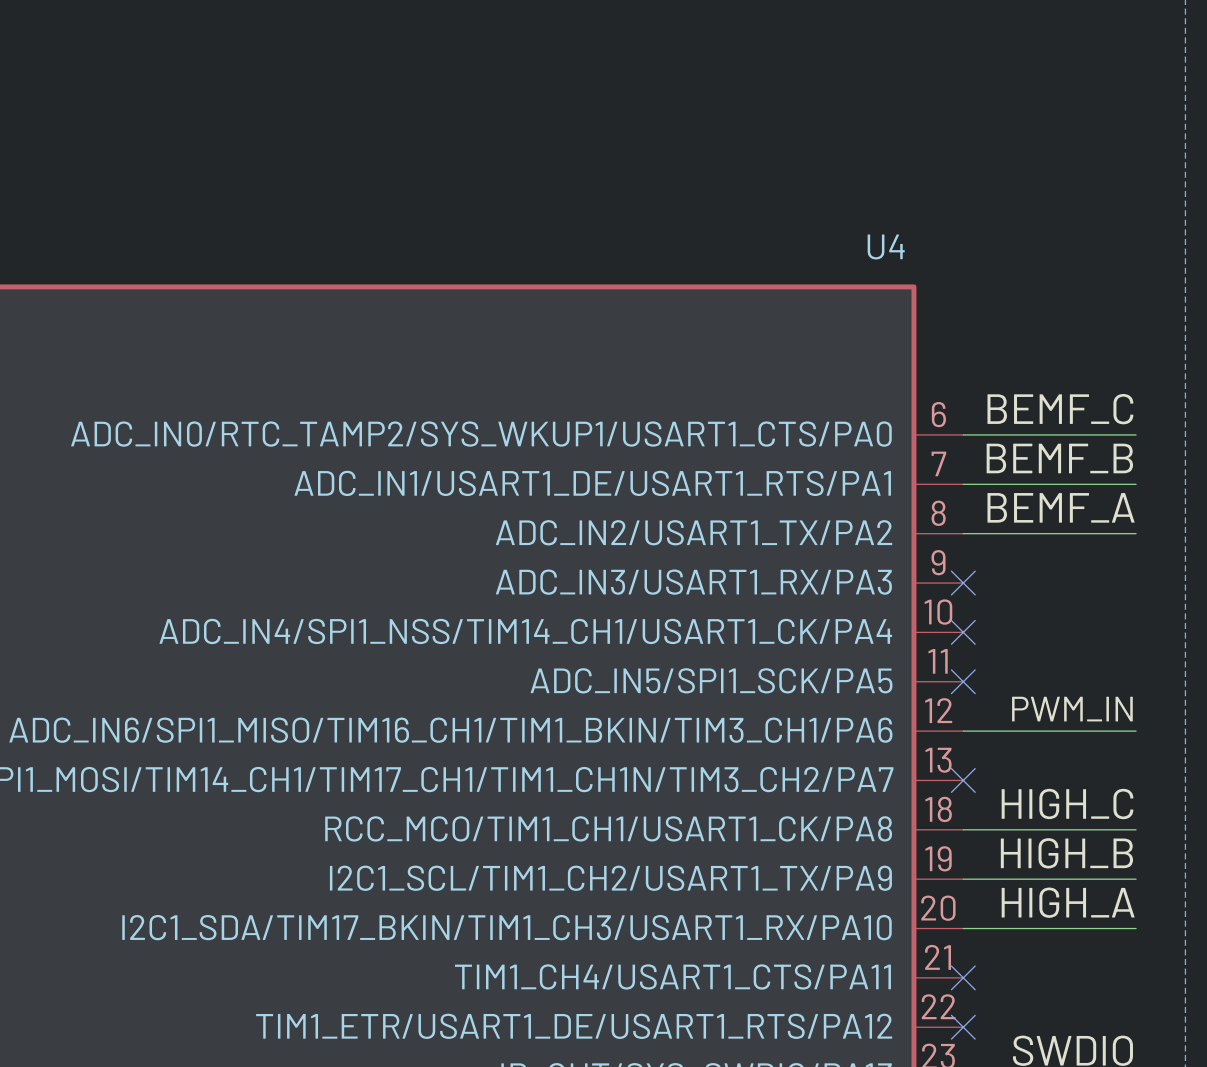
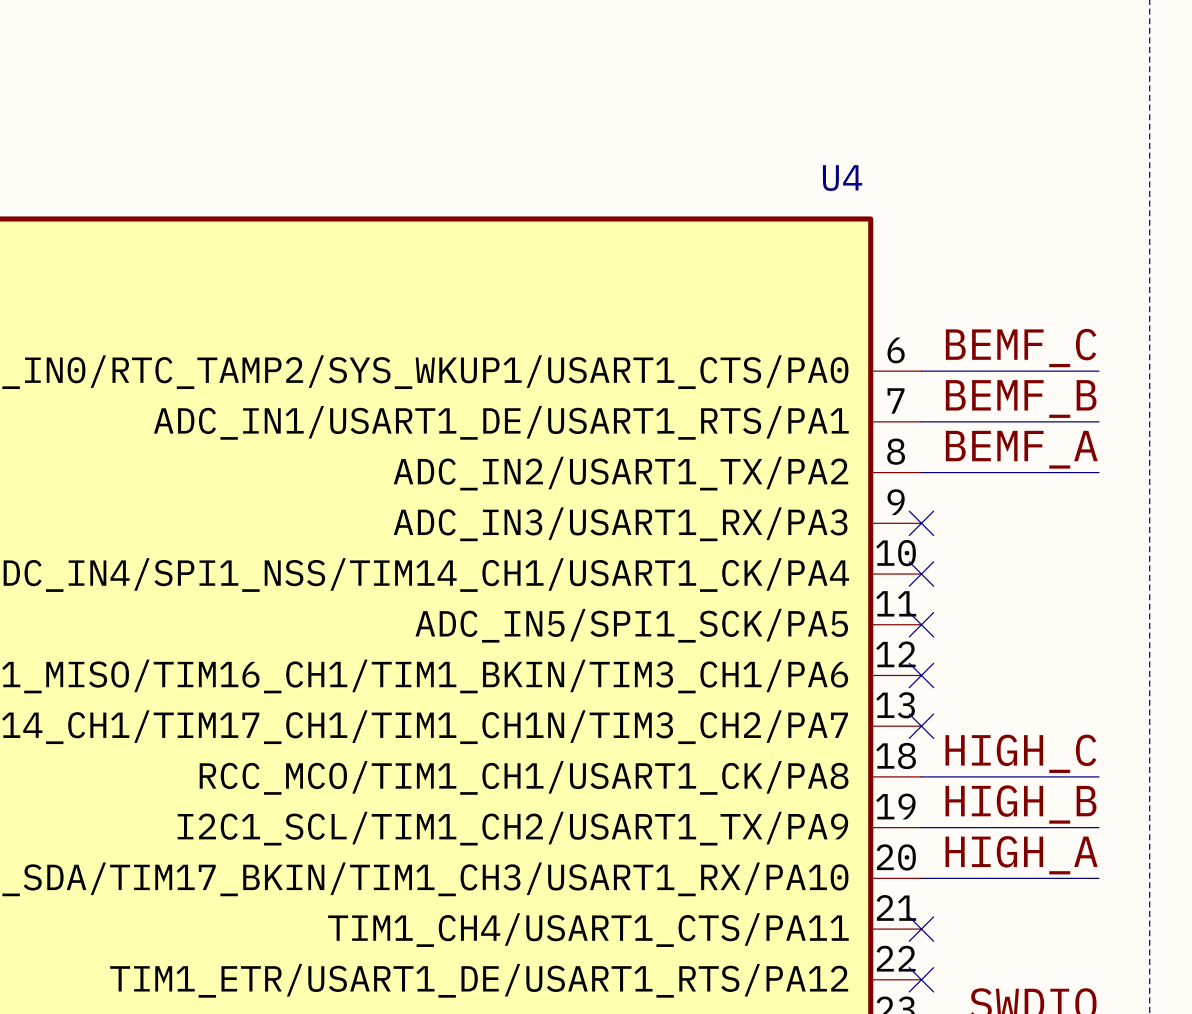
label: PWM_IN (1072, 709) -> none
wire: (963, 731) (1136, 731) -> none
no-connect mark: none -> (921, 675)

